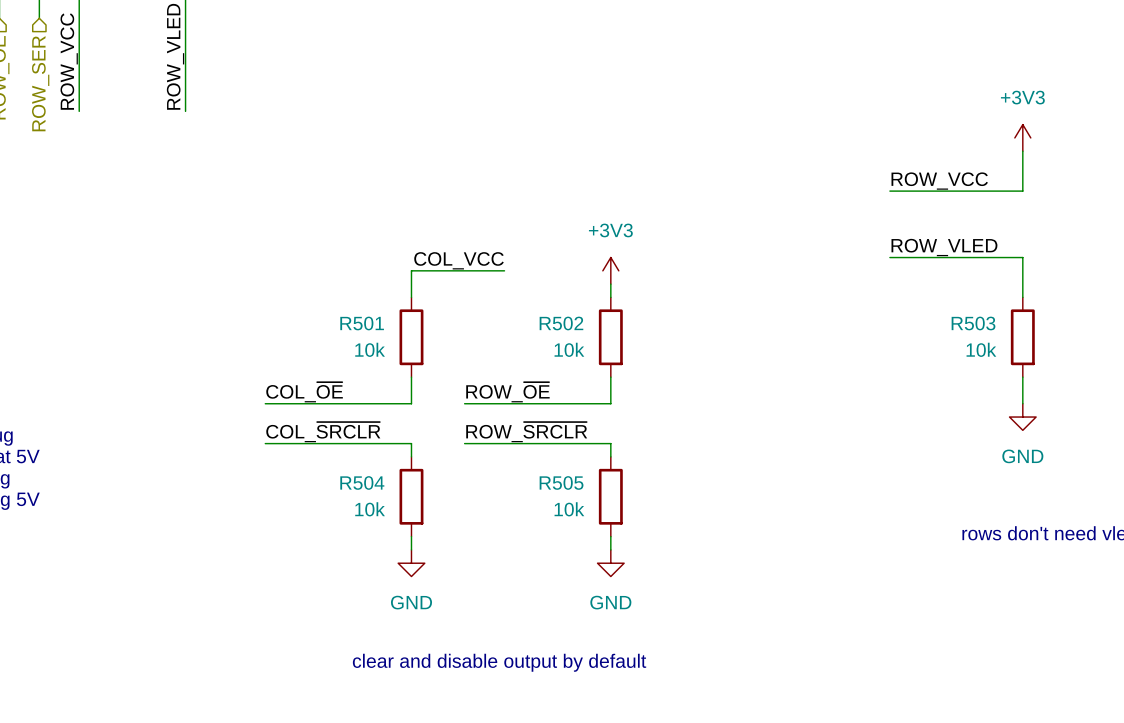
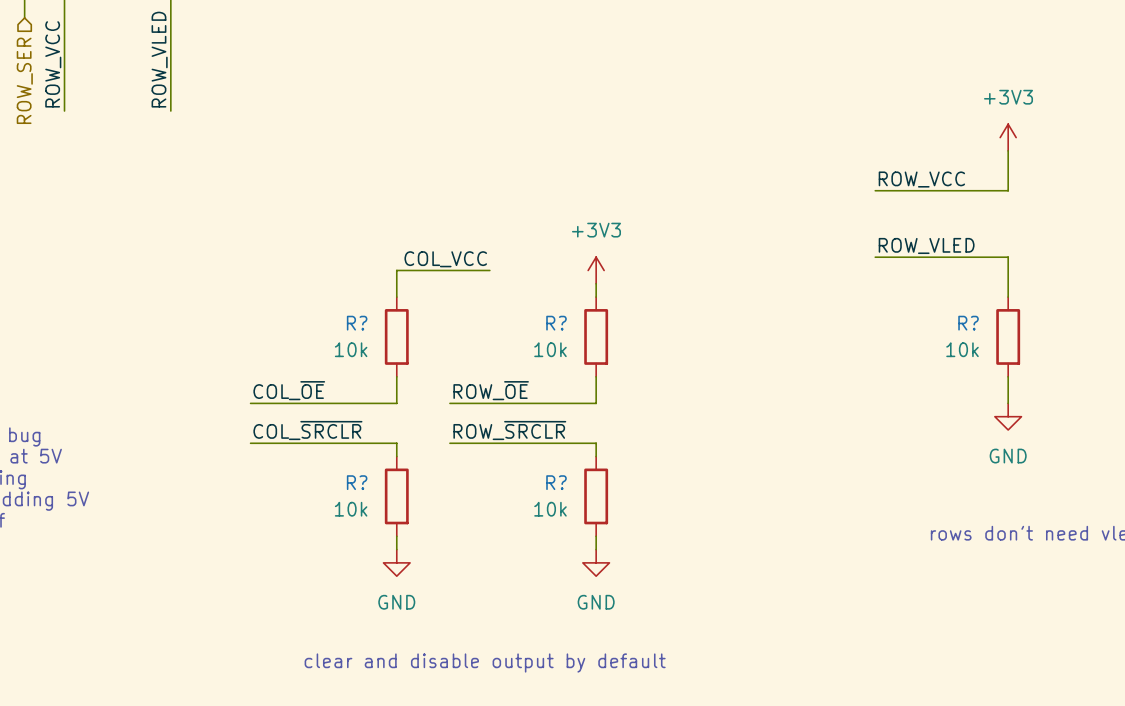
R501 name: R501 (362, 323) -> R? (357, 323)
R502 name: R502 (561, 323) -> R? (556, 323)
R503 name: R503 (973, 323) -> R? (968, 323)
R504 name: R504 (362, 482) -> R? (357, 482)
R505 name: R505 (561, 482) -> R? (556, 482)

